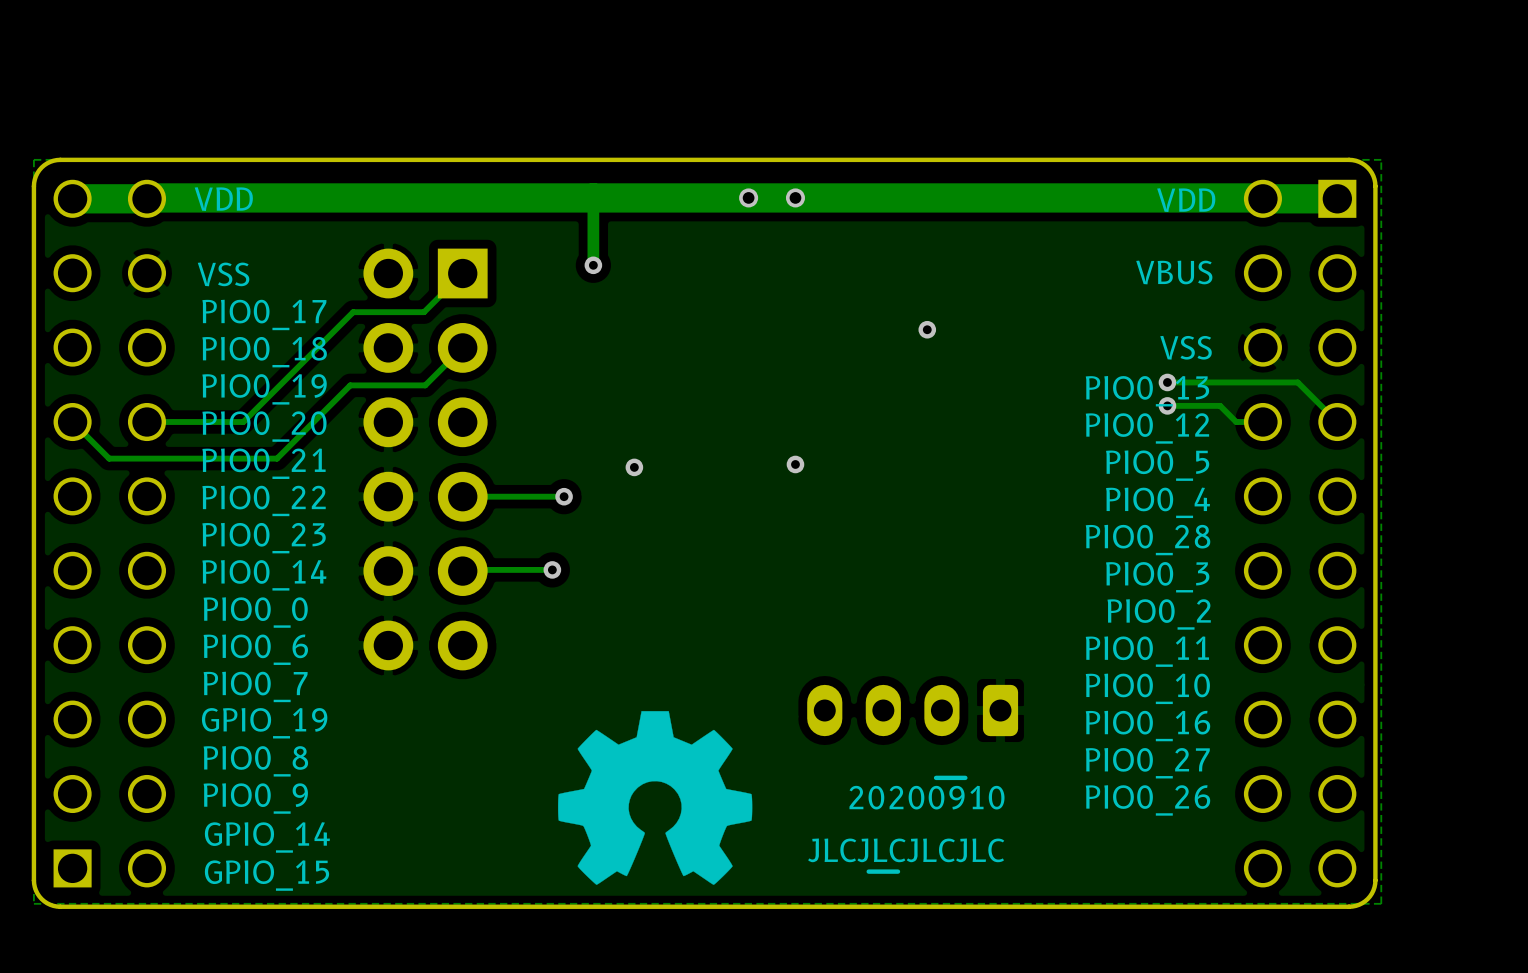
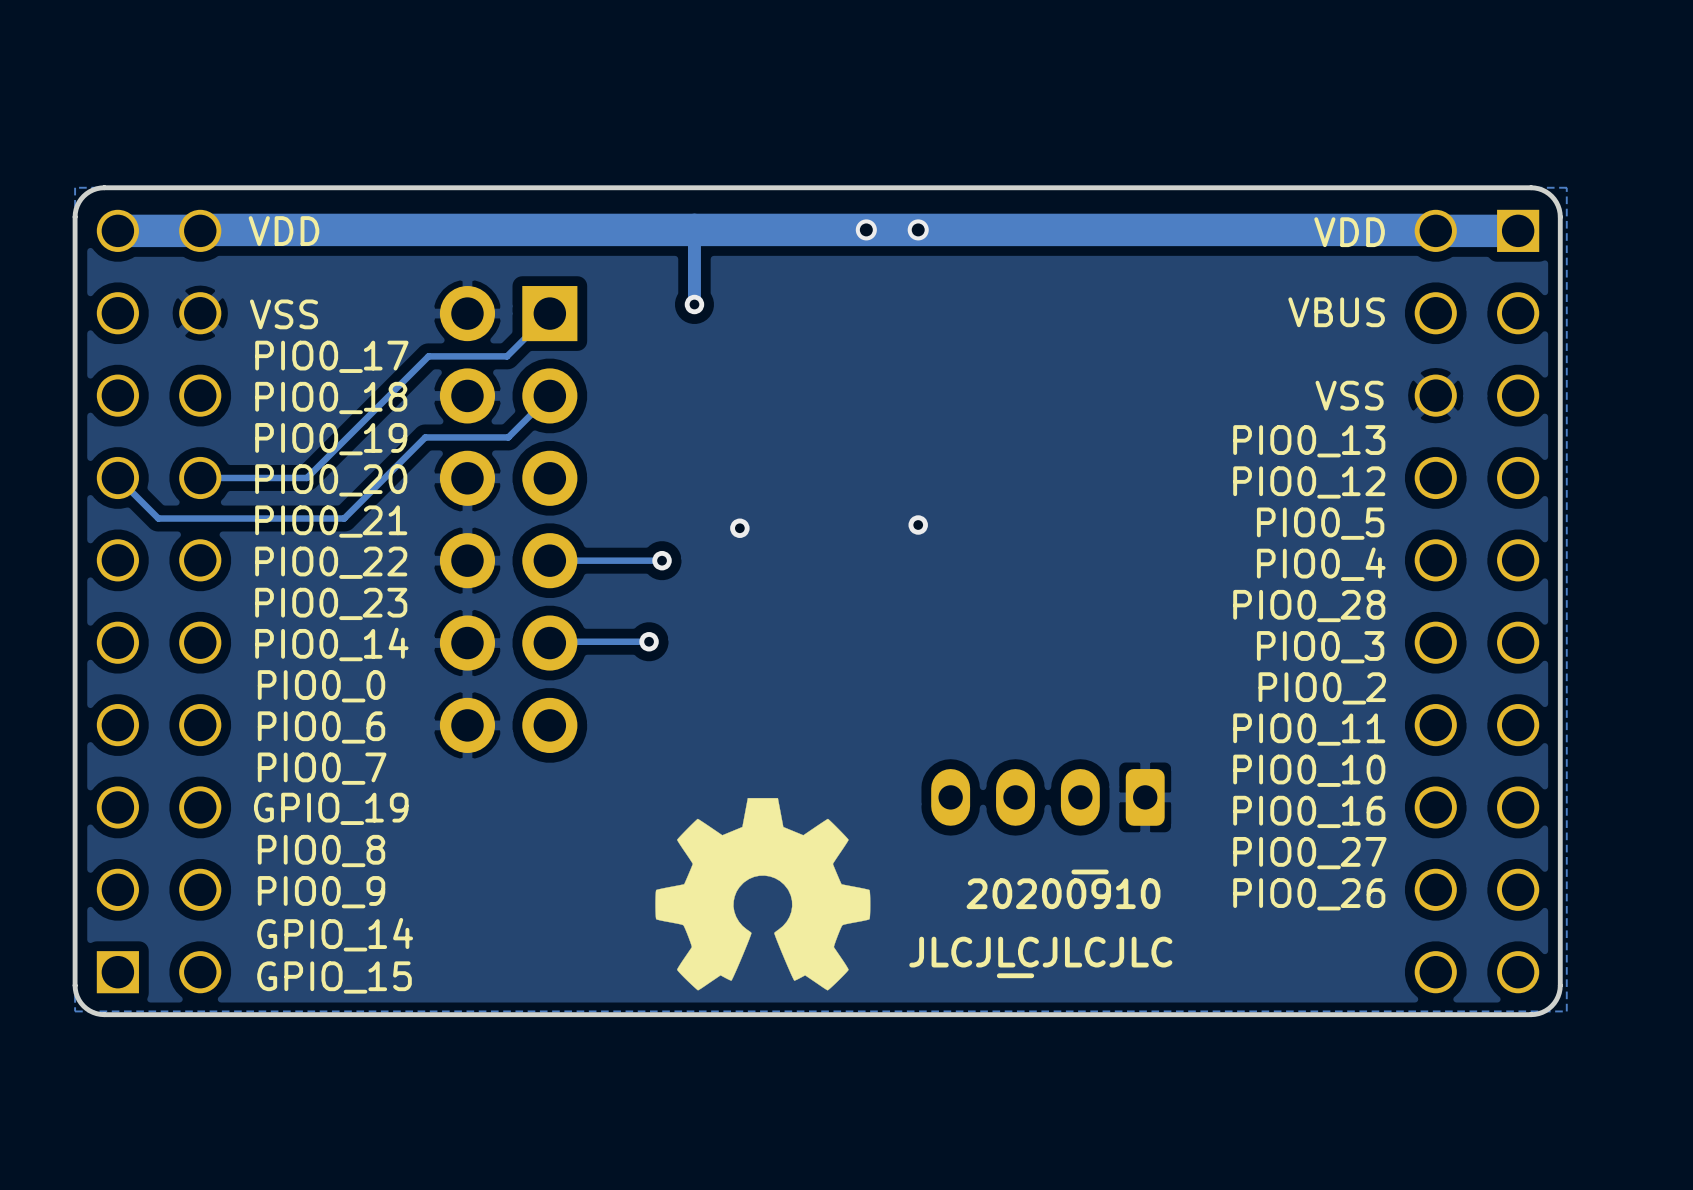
via: (927, 329) -> none
track: (1167, 382) (1297, 382) (1337, 422) -> none
via: (1167, 382) -> none
track: (1167, 405) (1220, 405) (1236, 422) (1262, 422) -> none
via: (1167, 405) -> none

